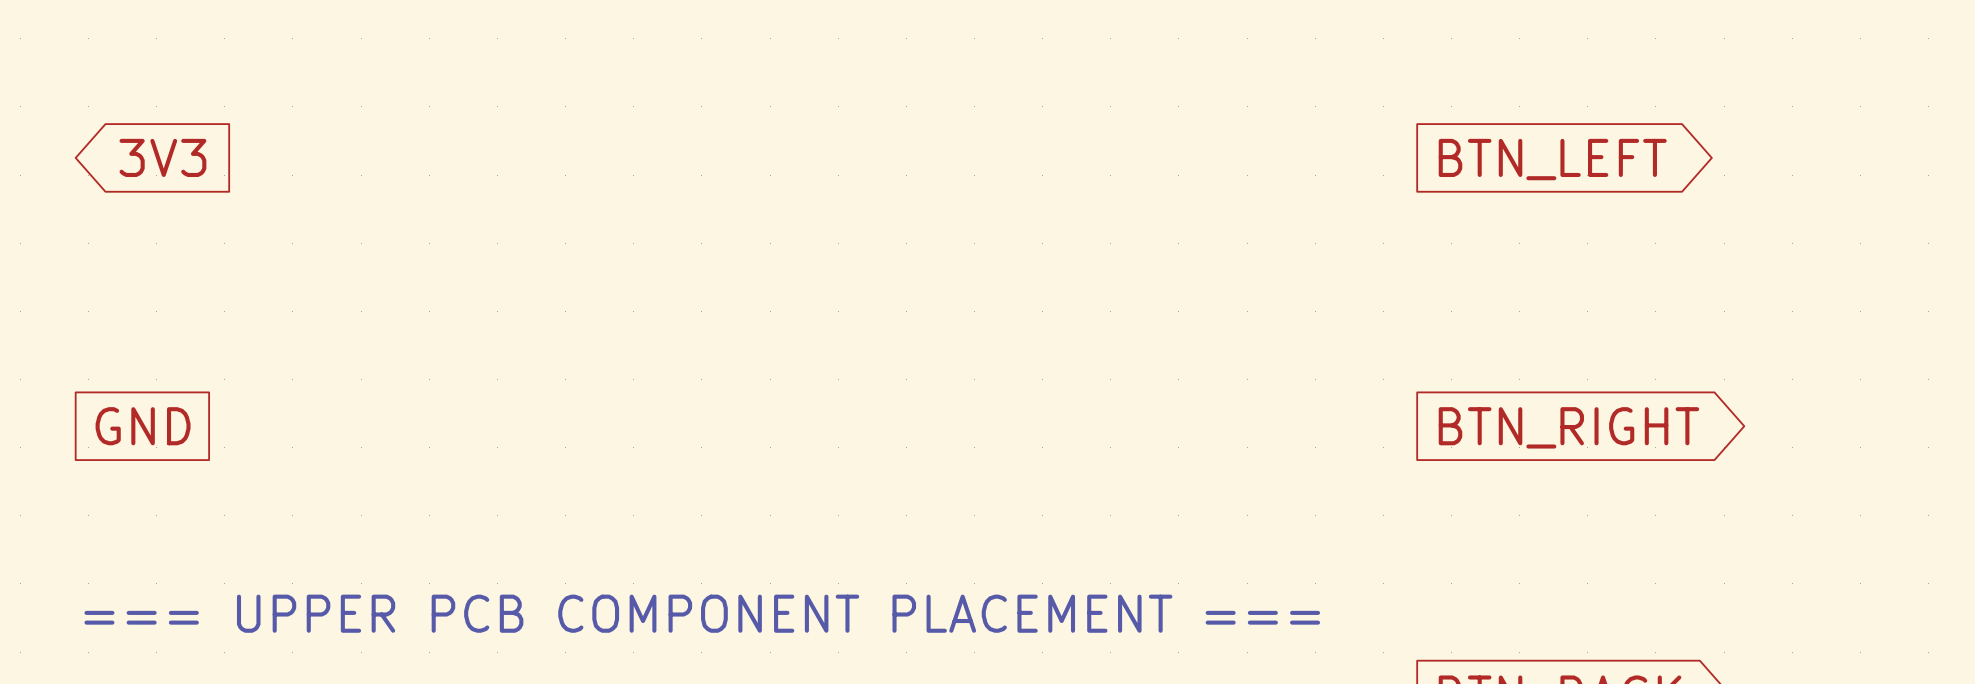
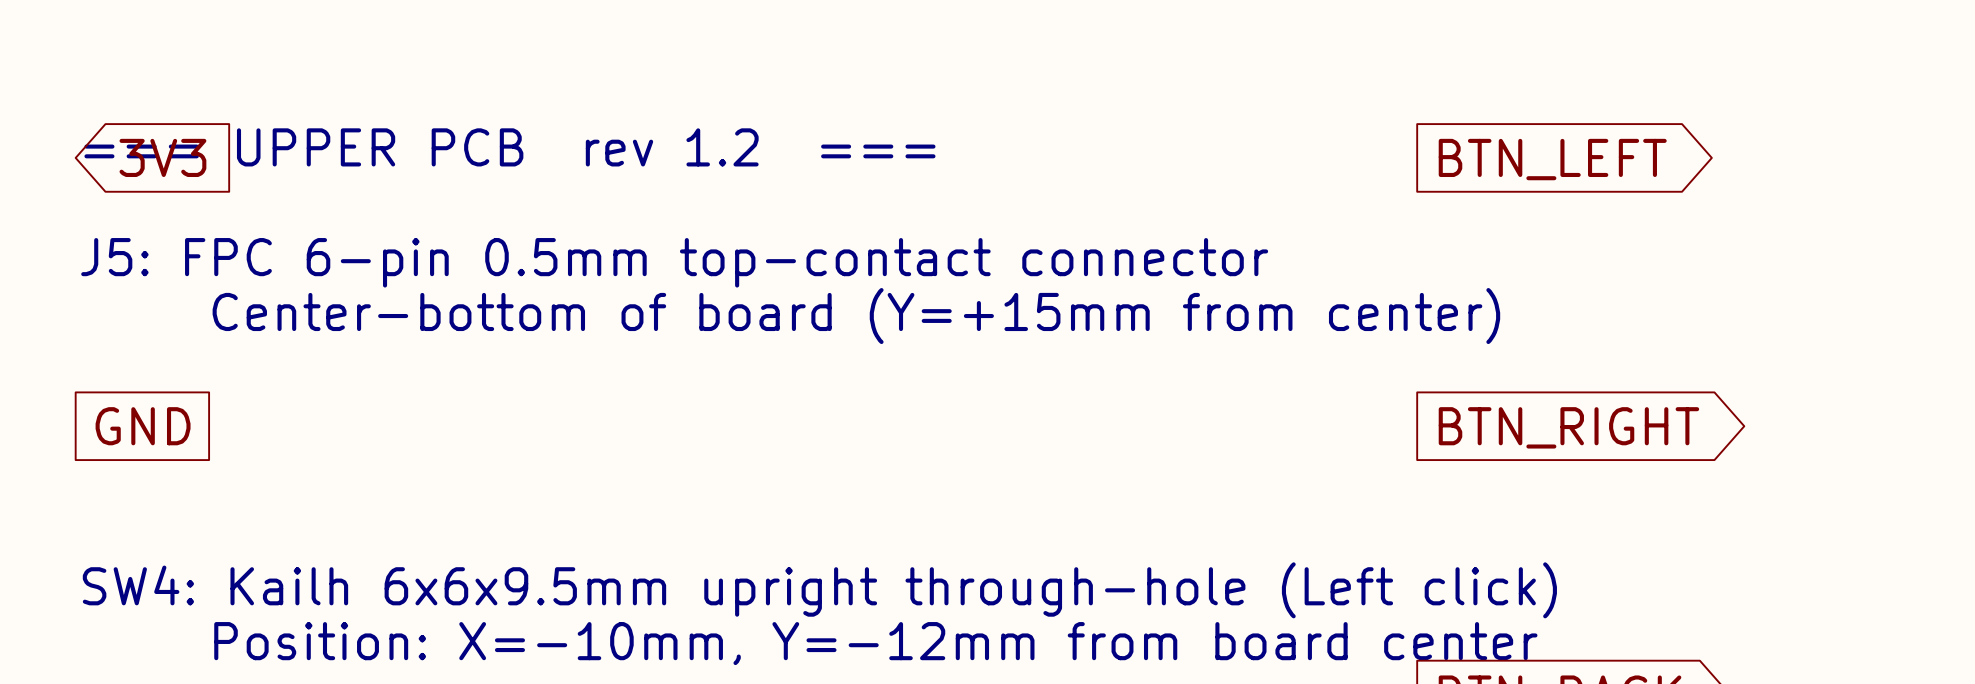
text: none -> === UPPER PCB rev 1.2 === (509, 147)
text: none -> J5: FPC 6-pin 0.5mm top-contact connector (674, 262)
text: none -> Center-bottom of board (Y=+15mm from center) (856, 316)
text: none -> SW4: Kailh 6x6x9.5mm upright through-hole (Left click) (819, 590)
text: === UPPER PCB COMPONENT PLACEMENT === (702, 613) -> none
text: none -> Position: X=-10mm, Y=-12mm from board center (875, 643)

